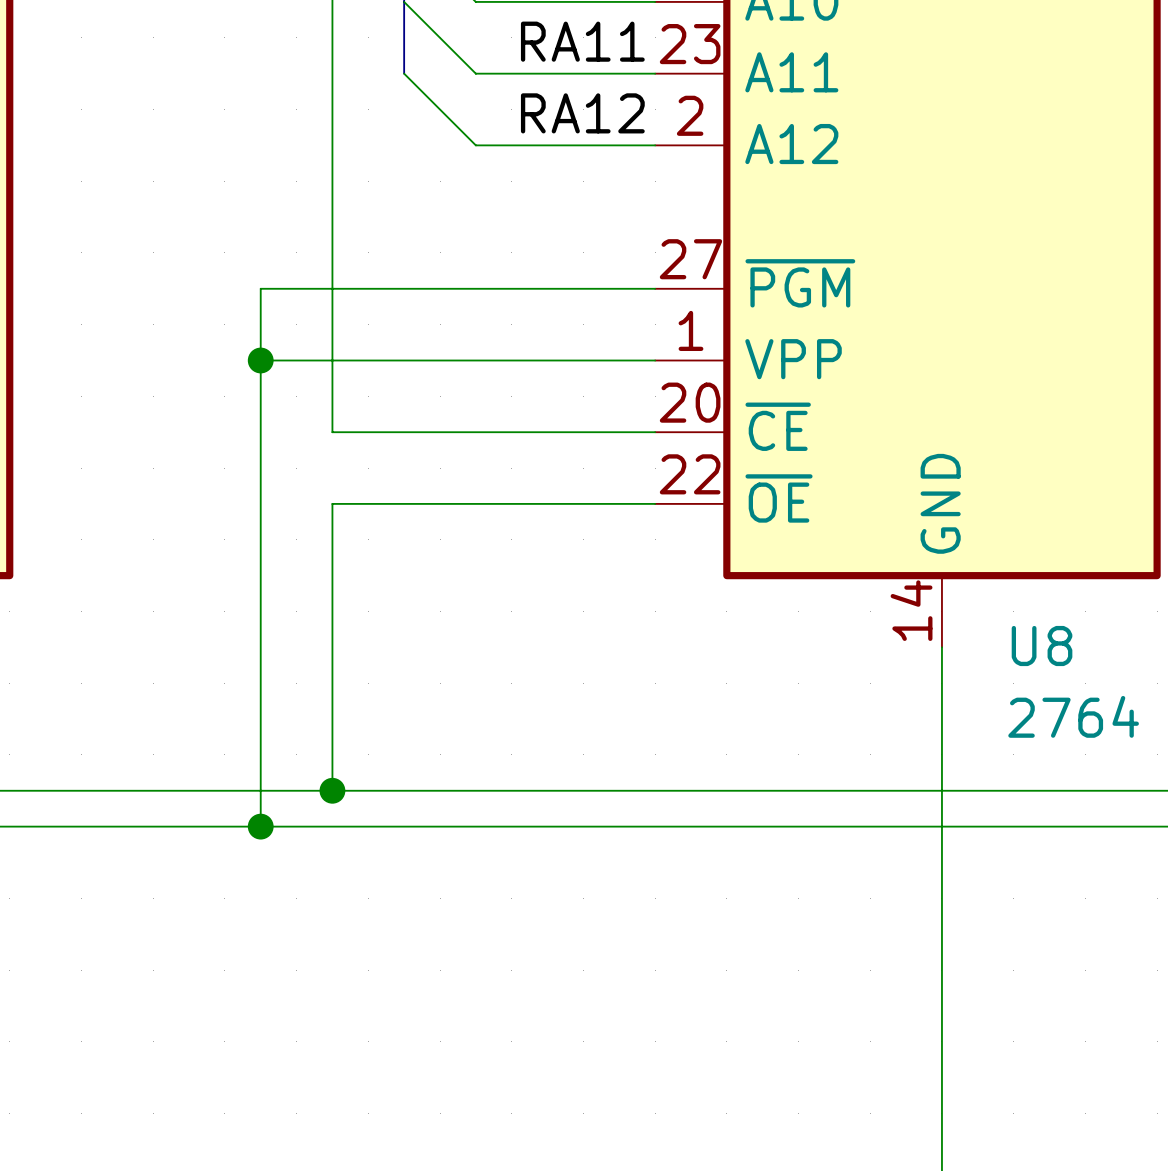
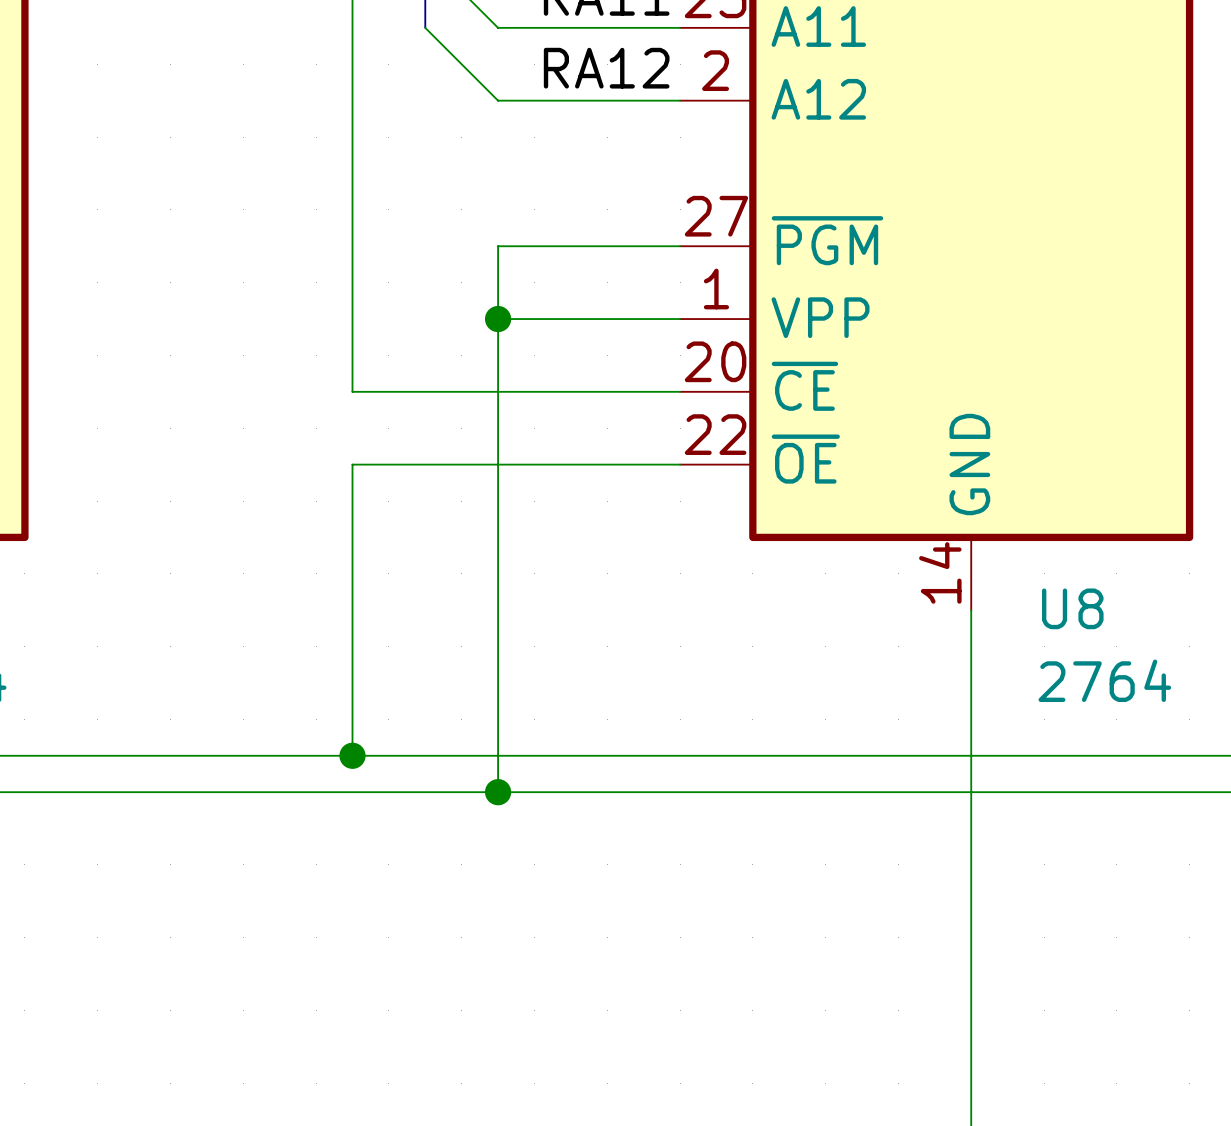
wire: (475, 288) (260, 288) (260, 826) -> (498, 246) (498, 792)
wire: (260, 360) (475, 360) -> none
junction: (260, 360) -> none
junction: none -> (498, 319)
junction: (260, 826) -> none
junction: none -> (498, 792)

